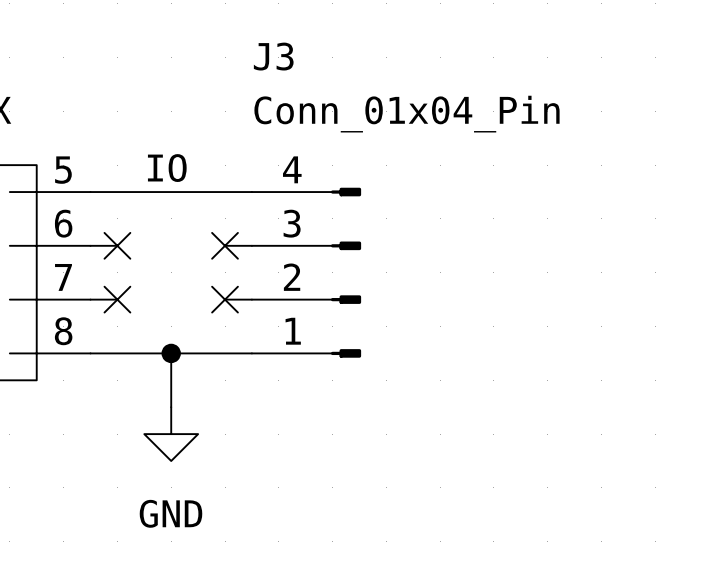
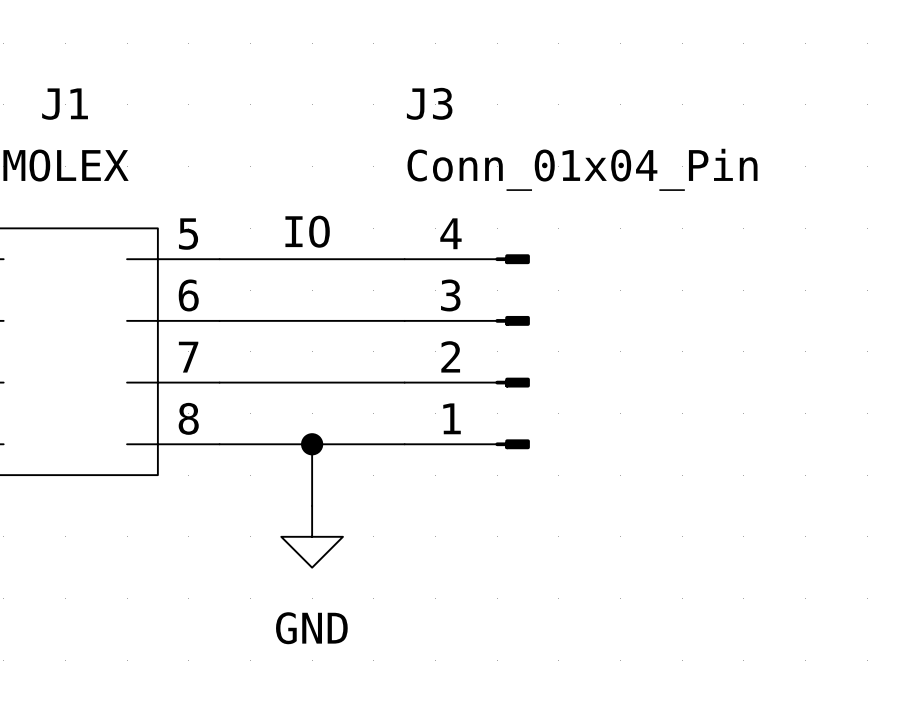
wire: none -> (250, 320) (373, 320)
no-connect mark: (117, 245) -> none
no-connect mark: (225, 245) -> none
wire: none -> (250, 382) (373, 382)
no-connect mark: (117, 299) -> none
no-connect mark: (225, 299) -> none

